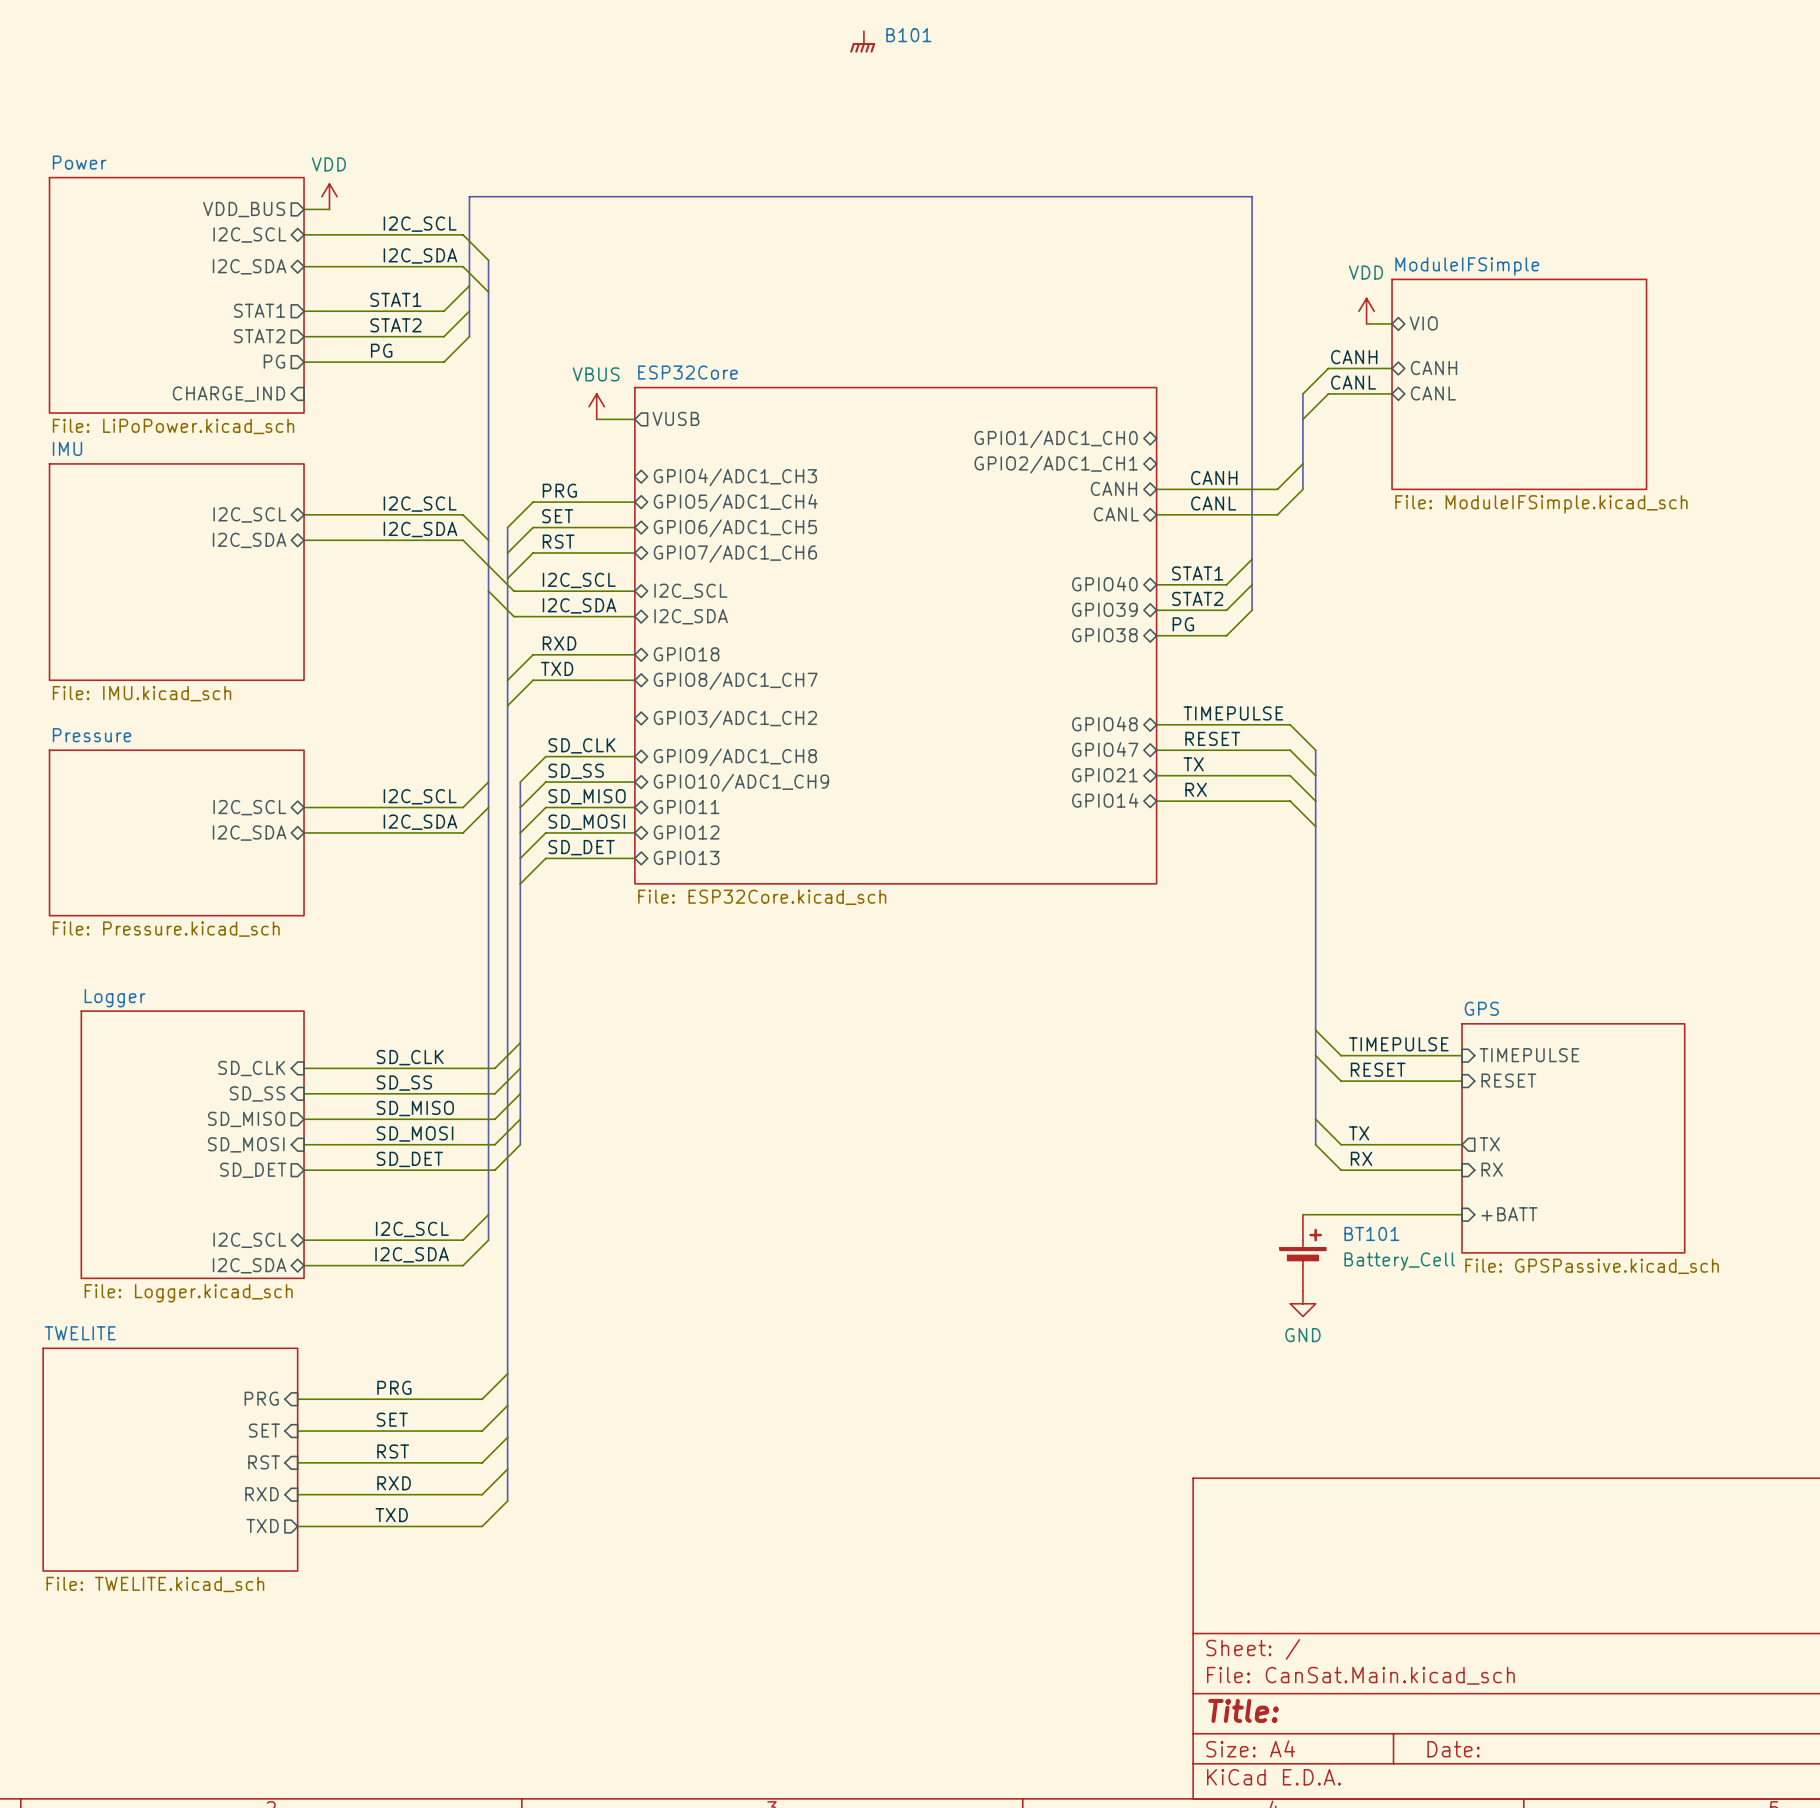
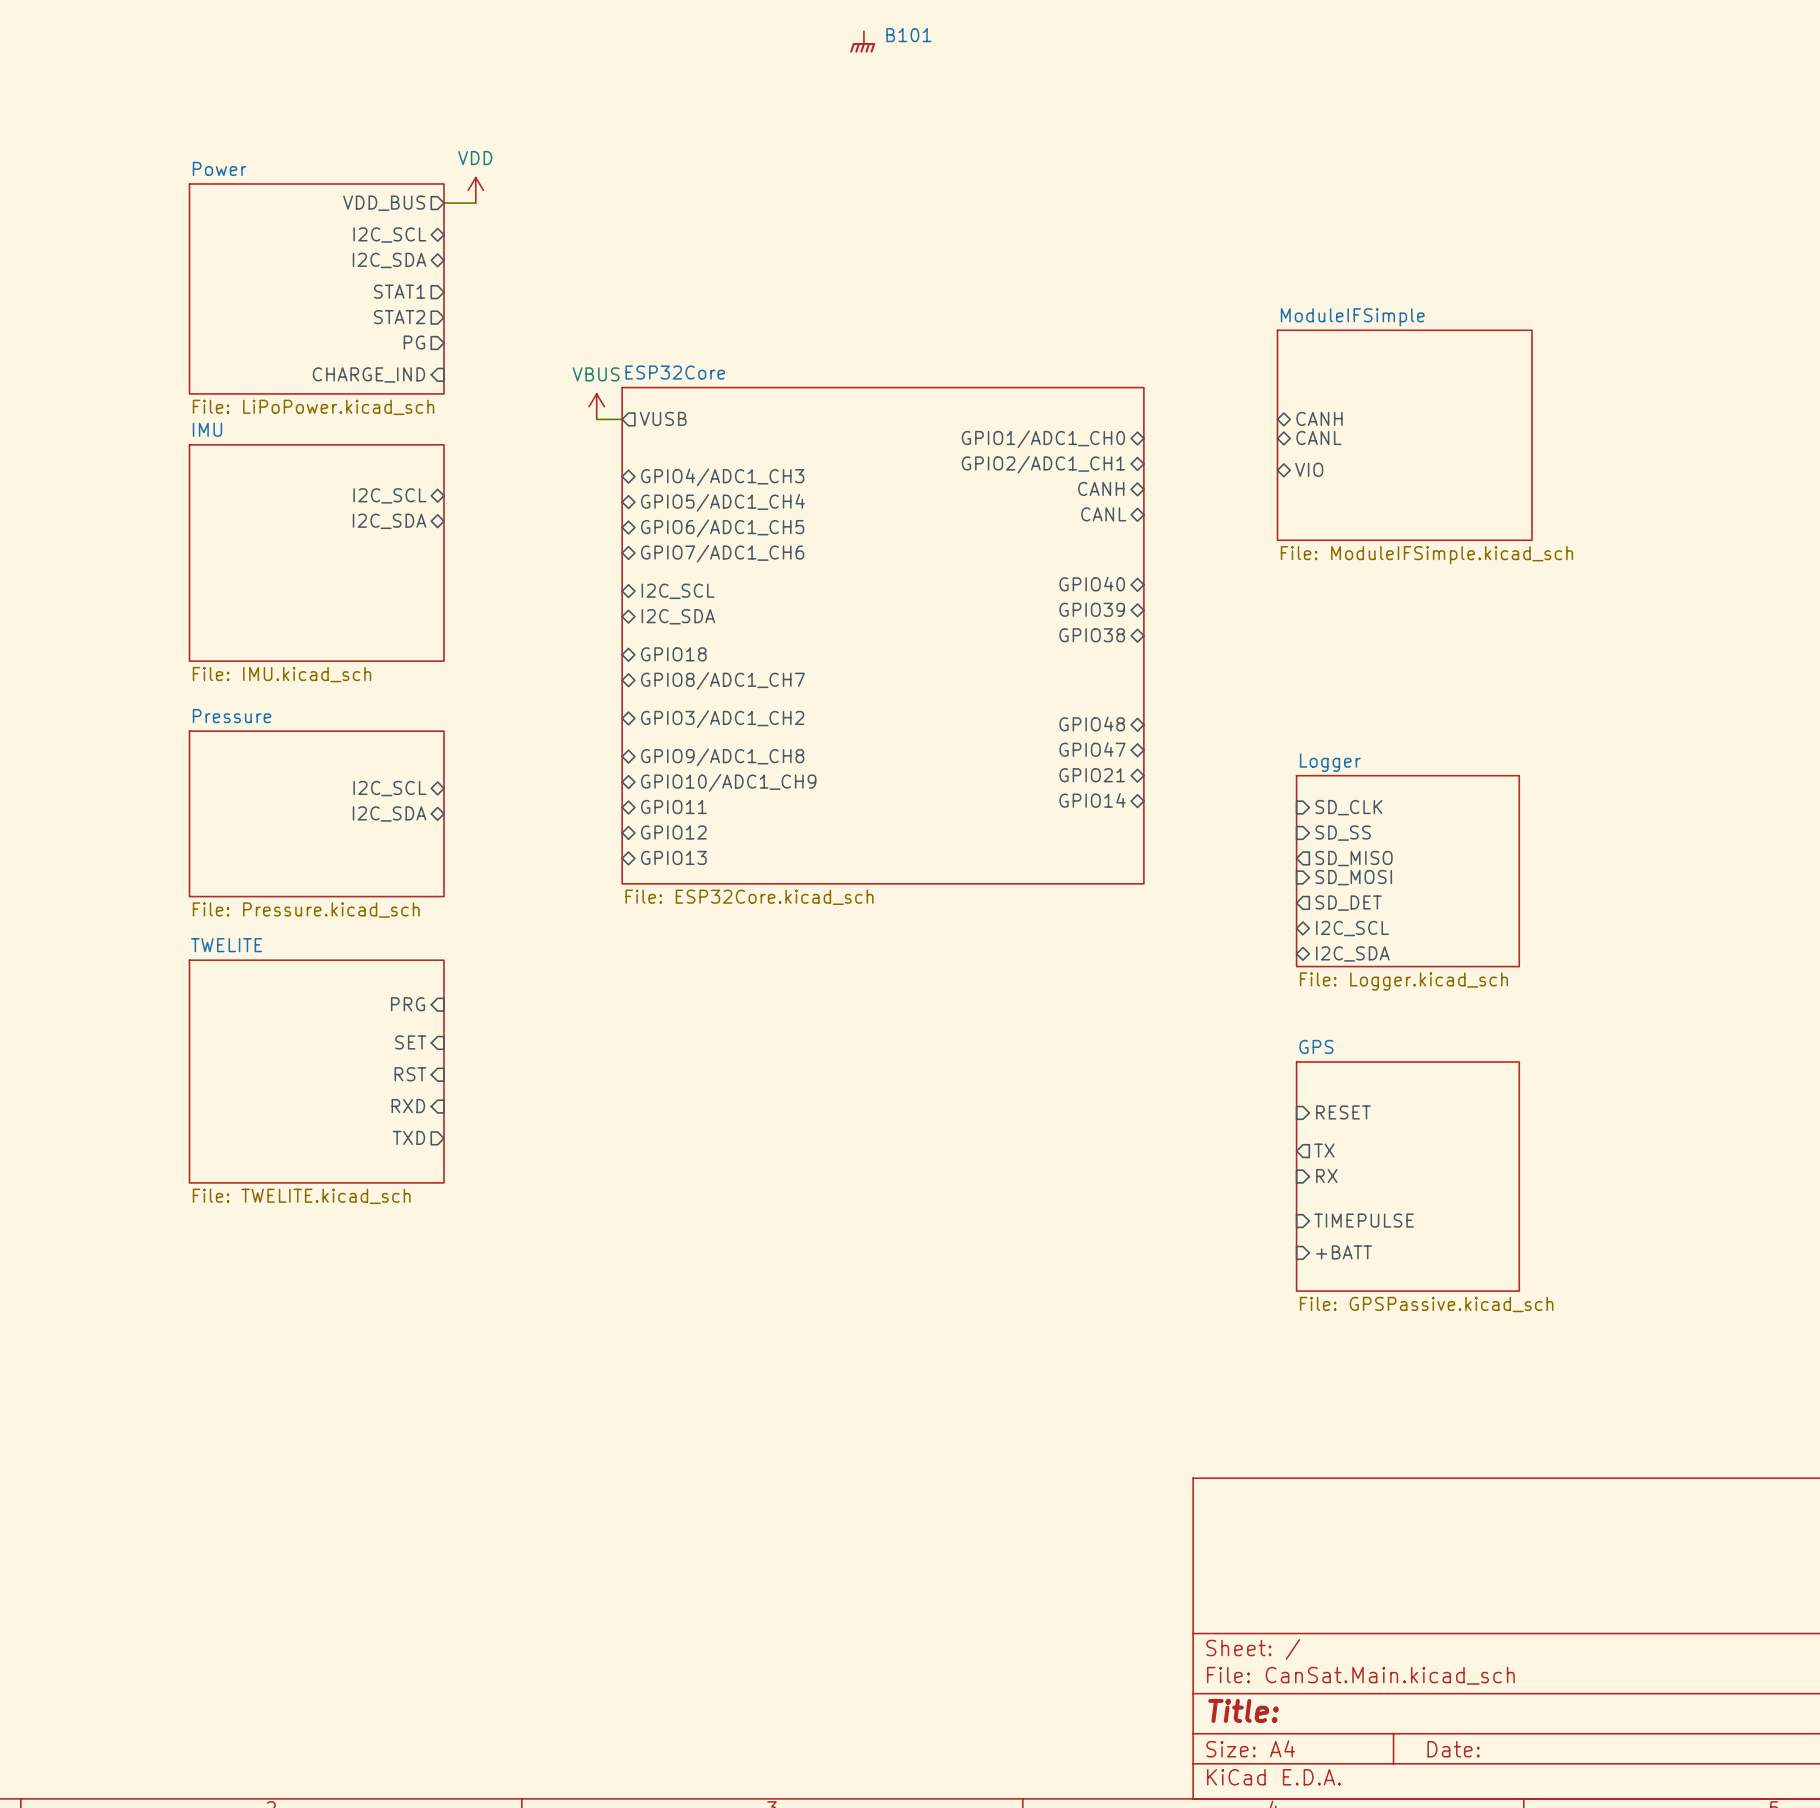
power symbol position: VDD (329, 196) -> VDD (475, 190)
wire: none -> (444, 203) (475, 203)
sheet pin position: VDD_BUS (244, 209) -> VDD_BUS (384, 203)
wire: (304, 209) (329, 209) -> none
label: I2C_SCL (420, 224) -> none
wire: (304, 234) (463, 234) (488, 260) -> none
sheet pin position: I2C_SCL (249, 235) -> I2C_SCL (389, 235)
label: I2C_SDA (420, 255) -> none
bus: (488, 260) (488, 1240) -> none
sheet pin position: I2C_SDA (249, 266) -> I2C_SDA (389, 260)
wire: (304, 266) (463, 266) (488, 292) -> none
wire: (469, 285) (444, 311) (304, 311) -> none
sheet Power: none -> File: LiPoPower.kicad_sch (316, 288)
sheet Power: File: LiPoPower.kicad_sch (176, 295) -> none
label: STAT1 (395, 299) -> none
sheet pin position: STAT1 (259, 310) -> STAT1 (399, 291)
wire: (469, 311) (444, 336) (304, 336) -> none
power symbol: VDD (1366, 311) -> none
wire: (1366, 323) (1392, 323) -> none
sheet pin position: VIO (1423, 323) -> VIO (1309, 469)
label: STAT2 (395, 325) -> none
sheet pin position: STAT2 (259, 336) -> STAT2 (399, 317)
wire: (469, 336) (444, 362) (304, 362) -> none
bus: (469, 336) (469, 196) (1252, 196) (1252, 610) -> none
label: PG (381, 350) -> none
label: CANH (1354, 357) -> none
sheet pin position: PG (274, 361) -> PG (414, 342)
wire: (1392, 368) (1328, 368) (1302, 393) -> none
sheet pin: CANH (1434, 368) -> none
label: CANL (1353, 382) -> none
sheet ModuleIFSimple position: (1519, 384) -> (1404, 435)
bus: (1302, 393) (1302, 489) -> none
wire: (1392, 393) (1328, 393) (1302, 419) -> none
sheet pin: CANL (1433, 393) -> none
sheet pin position: CHARGE_IND (228, 394) -> CHARGE_IND (368, 374)
sheet pin position: VUSB (675, 418) -> VUSB (663, 418)
sheet pin: none -> CANH (1319, 418)
wire: (622, 419) (634, 419) -> none
sheet pin: none -> CANL (1318, 438)
sheet pin position: GPIO1/ADC1_CH0 (1056, 439) -> GPIO1/ADC1_CH0 (1043, 439)
wire: (1302, 463) (1277, 489) (1156, 489) -> none
sheet pin position: GPIO2/ADC1_CH1 (1056, 464) -> GPIO2/ADC1_CH1 (1043, 464)
sheet pin position: GPIO4/ADC1_CH3 (735, 477) -> GPIO4/ADC1_CH3 (722, 477)
label: CANH (1214, 478) -> none
sheet pin position: CANH (1113, 488) -> CANH (1101, 488)
wire: (1302, 489) (1277, 514) (1156, 514) -> none
label: PRG (559, 490) -> none
sheet pin: none -> I2C_SCL (389, 495)
wire: (634, 502) (533, 502) (507, 527) -> none
sheet pin position: GPIO5/ADC1_CH4 (735, 502) -> GPIO5/ADC1_CH4 (722, 502)
label: CANL (1213, 503) -> none
label: I2C_SCL (420, 504) -> none
sheet pin: I2C_SCL (249, 514) -> none
wire: (304, 514) (463, 514) (488, 540) -> none
sheet pin position: CANL (1116, 514) -> CANL (1103, 514)
label: SET (557, 516) -> none
sheet pin: none -> I2C_SDA (389, 521)
bus: (507, 527) (507, 1501) -> none
wire: (634, 527) (533, 527) (507, 553) -> none
sheet pin position: GPIO6/ADC1_CH5 (735, 528) -> GPIO6/ADC1_CH5 (722, 528)
label: I2C_SDA (420, 529) -> none
sheet pin: I2C_SDA (249, 540) -> none
wire: (304, 540) (463, 540) (513, 591) (634, 591) -> none
label: RST (558, 541) -> none
wire: (634, 553) (533, 553) (507, 578) -> none
sheet pin position: GPIO7/ADC1_CH6 (735, 553) -> GPIO7/ADC1_CH6 (722, 553)
wire: (1252, 559) (1226, 584) (1156, 584) -> none
sheet IMU position: (176, 572) -> (316, 553)
label: STAT1 (1197, 573) -> none
label: I2C_SCL (579, 580) -> none
sheet pin position: GPIO40 (1104, 584) -> GPIO40 (1092, 584)
wire: (1252, 584) (1226, 610) (1156, 610) -> none
wire: (488, 591) (513, 616) (634, 616) -> none
sheet pin position: I2C_SCL (690, 591) -> I2C_SCL (678, 591)
label: STAT2 (1197, 598) -> none
label: I2C_SDA (579, 605) -> none
sheet pin position: GPIO39 (1104, 609) -> GPIO39 (1092, 609)
wire: (1252, 610) (1226, 635) (1156, 635) -> none
sheet pin position: I2C_SDA (691, 616) -> I2C_SDA (678, 616)
label: PG (1183, 624) -> none
sheet ESP32Core position: (895, 635) -> (883, 635)
sheet pin position: GPIO38 (1104, 635) -> GPIO38 (1092, 635)
label: RXD (559, 643) -> none
wire: (634, 654) (533, 654) (507, 680) -> none
sheet pin position: GPIO18 (686, 654) -> GPIO18 (673, 654)
label: TXD (557, 668) -> none
wire: (634, 680) (533, 680) (507, 705) -> none
sheet pin position: GPIO8/ADC1_CH7 (735, 680) -> GPIO8/ADC1_CH7 (722, 680)
label: TIMEPULSE (1233, 713) -> none
sheet pin position: GPIO3/ADC1_CH2 (735, 719) -> GPIO3/ADC1_CH2 (722, 719)
sheet pin position: GPIO48 (1104, 724) -> GPIO48 (1092, 724)
wire: (1156, 724) (1290, 724) (1315, 750) -> none
label: RESET (1212, 738) -> none
label: SD_CLK (581, 745) -> none
sheet pin position: GPIO47 (1105, 749) -> GPIO47 (1092, 749)
wire: (1156, 750) (1290, 750) (1315, 775) -> none
bus: (1315, 750) (1315, 1144) -> none
wire: (545, 756) (634, 756) -> none
wire: (545, 756) (520, 782) -> none
sheet pin position: GPIO9/ADC1_CH8 (735, 757) -> GPIO9/ADC1_CH8 (722, 757)
label: TX (1193, 764) -> none
label: SD_SS (576, 771) -> none
sheet pin position: GPIO21 (1104, 775) -> GPIO21 (1092, 775)
wire: (1156, 775) (1290, 775) (1315, 801) -> none
wire: (488, 782) (463, 807) (304, 807) -> none
bus: (520, 782) (520, 1144) -> none
wire: (545, 782) (634, 782) -> none
wire: (545, 782) (520, 807) -> none
sheet pin position: GPIO10/ADC1_CH9 (741, 782) -> GPIO10/ADC1_CH9 (728, 782)
label: RX (1196, 789) -> none
label: I2C_SCL (420, 796) -> none
label: SD_MISO (587, 796) -> none
sheet pin position: GPIO14 (1105, 800) -> GPIO14 (1092, 800)
wire: (1156, 801) (1290, 801) (1315, 826) -> none
sheet pin position: I2C_SCL (249, 807) -> I2C_SCL (389, 788)
wire: (488, 807) (463, 832) (304, 832) -> none
wire: (545, 807) (634, 807) -> none
wire: (545, 807) (520, 832) -> none
sheet pin position: GPIO11 (686, 807) -> GPIO11 (673, 807)
sheet pin: none -> SD_CLK (1348, 807)
label: I2C_SDA (420, 822) -> none
label: SD_MOSI (586, 822) -> none
sheet Pressure position: (176, 832) -> (316, 813)
wire: (545, 832) (634, 832) -> none
wire: (545, 832) (520, 858) -> none
sheet pin position: GPIO12 (686, 832) -> GPIO12 (673, 832)
sheet pin position: I2C_SDA (249, 833) -> I2C_SDA (389, 814)
sheet pin: none -> SD_SS (1343, 833)
label: SD_DET (581, 847) -> none
sheet pin position: GPIO13 (686, 857) -> GPIO13 (673, 857)
wire: (545, 858) (634, 858) -> none
wire: (545, 858) (520, 883) -> none
sheet pin: none -> SD_MISO (1354, 858)
sheet Logger: none -> File: Logger.kicad_sch (1407, 871)
sheet pin: none -> SD_MOSI (1353, 877)
sheet pin: none -> SD_DET (1348, 903)
sheet pin: none -> I2C_SCL (1352, 928)
sheet pin: none -> I2C_SDA (1352, 953)
sheet pin: none -> PRG (408, 1004)
wire: (1315, 1030) (1341, 1055) (1462, 1055) -> none
sheet pin: none -> SET (410, 1042)
wire: (520, 1042) (494, 1068) (304, 1068) -> none
label: TIMEPULSE (1398, 1044) -> none
wire: (1315, 1055) (1341, 1081) -> none
sheet pin position: TIMEPULSE (1529, 1055) -> TIMEPULSE (1364, 1220)
label: SD_CLK (410, 1057) -> none
sheet pin: SD_CLK (251, 1068) -> none
wire: (520, 1068) (494, 1093) (304, 1093) -> none
label: RESET (1378, 1069) -> none
sheet TWELITE: none -> File: TWELITE.kicad_sch (316, 1071)
sheet pin: none -> RST (410, 1074)
sheet pin position: RESET (1508, 1080) -> RESET (1343, 1112)
wire: (1341, 1081) (1462, 1081) -> none
label: SD_SS (404, 1083) -> none
sheet pin: SD_SS (257, 1093) -> none
wire: (520, 1093) (494, 1119) (304, 1119) -> none
sheet pin: none -> RXD (408, 1106)
label: SD_MISO (415, 1108) -> none
sheet pin: SD_MISO (246, 1119) -> none
wire: (520, 1119) (494, 1144) (304, 1144) -> none
wire: (1315, 1119) (1341, 1144) (1462, 1144) -> none
label: SD_MOSI (415, 1133) -> none
label: TX (1359, 1133) -> none
sheet pin: none -> TXD (408, 1137)
sheet GPS position: (1573, 1138) -> (1407, 1176)
sheet Logger: File: Logger.kicad_sch (192, 1144) -> none
sheet pin: SD_MOSI (246, 1144) -> none
wire: (520, 1144) (494, 1170) (304, 1170) -> none
wire: (1315, 1144) (1341, 1170) (1462, 1170) -> none
sheet pin position: TX (1489, 1144) -> TX (1324, 1150)
label: RX (1361, 1158) -> none
label: SD_DET (409, 1159) -> none
sheet pin position: RX (1492, 1169) -> RX (1326, 1176)
sheet pin: SD_DET (253, 1170) -> none
wire: (488, 1214) (463, 1240) (304, 1240) -> none
wire: (1302, 1214) (1462, 1214) -> none
sheet pin position: +BATT (1509, 1214) -> +BATT (1344, 1252)
label: I2C_SCL (412, 1229) -> none
sheet pin: I2C_SCL (249, 1240) -> none
wire: (488, 1240) (463, 1265) (304, 1265) -> none
BT101: Battery_Cell (1302, 1252) -> none
label: I2C_SDA (412, 1254) -> none
sheet pin: I2C_SDA (249, 1265) -> none
power symbol: GND (1302, 1303) -> none
wire: (507, 1373) (482, 1399) (297, 1399) -> none
label: PRG (394, 1387) -> none
sheet pin: PRG (261, 1398) -> none
wire: (507, 1405) (482, 1431) (297, 1431) -> none
label: SET (392, 1419) -> none
sheet pin: SET (264, 1430) -> none
wire: (507, 1437) (482, 1462) (297, 1462) -> none
label: RST (393, 1451) -> none
sheet TWELITE: File: TWELITE.kicad_sch (170, 1459) -> none
sheet pin: RST (264, 1462) -> none
wire: (507, 1469) (482, 1494) (297, 1494) -> none
label: RXD (394, 1483) -> none
sheet pin: RXD (262, 1494) -> none
wire: (507, 1501) (482, 1526) (297, 1526) -> none
label: TXD (391, 1515) -> none
sheet pin: TXD (262, 1526) -> none

